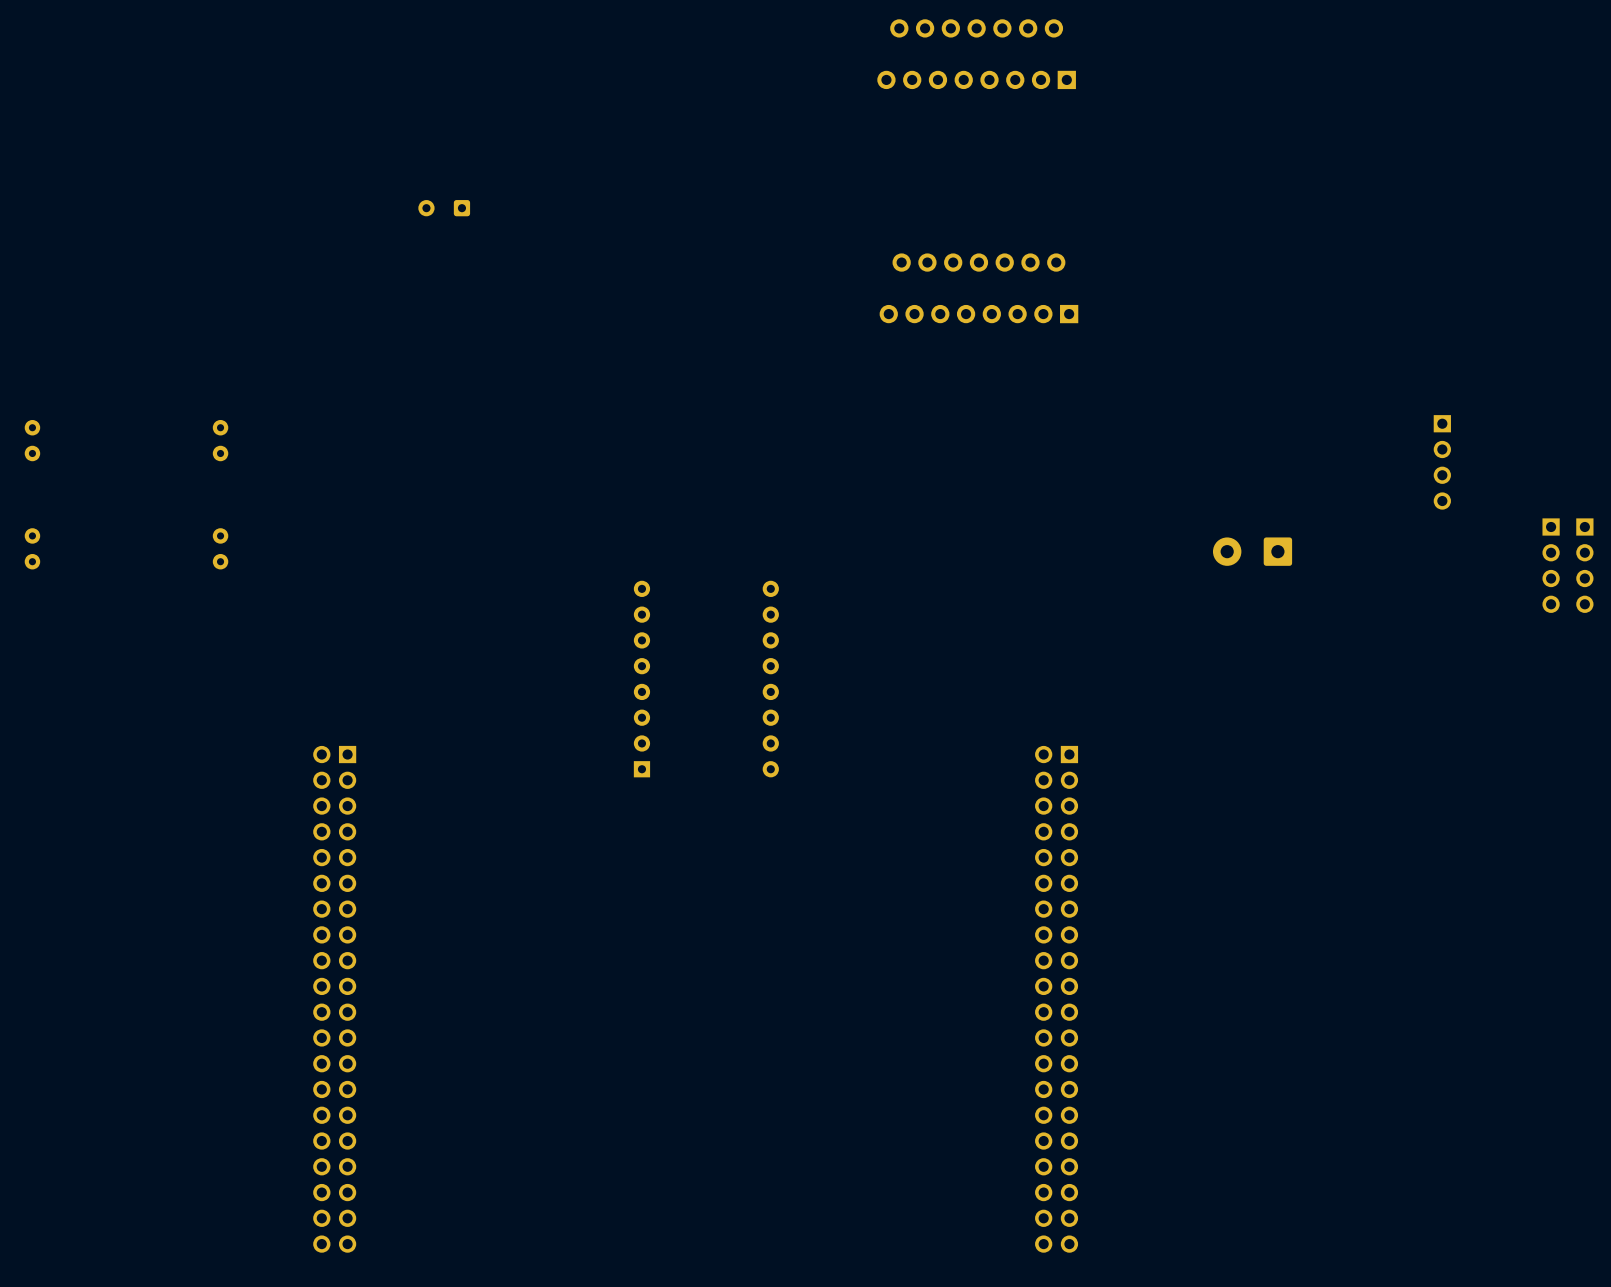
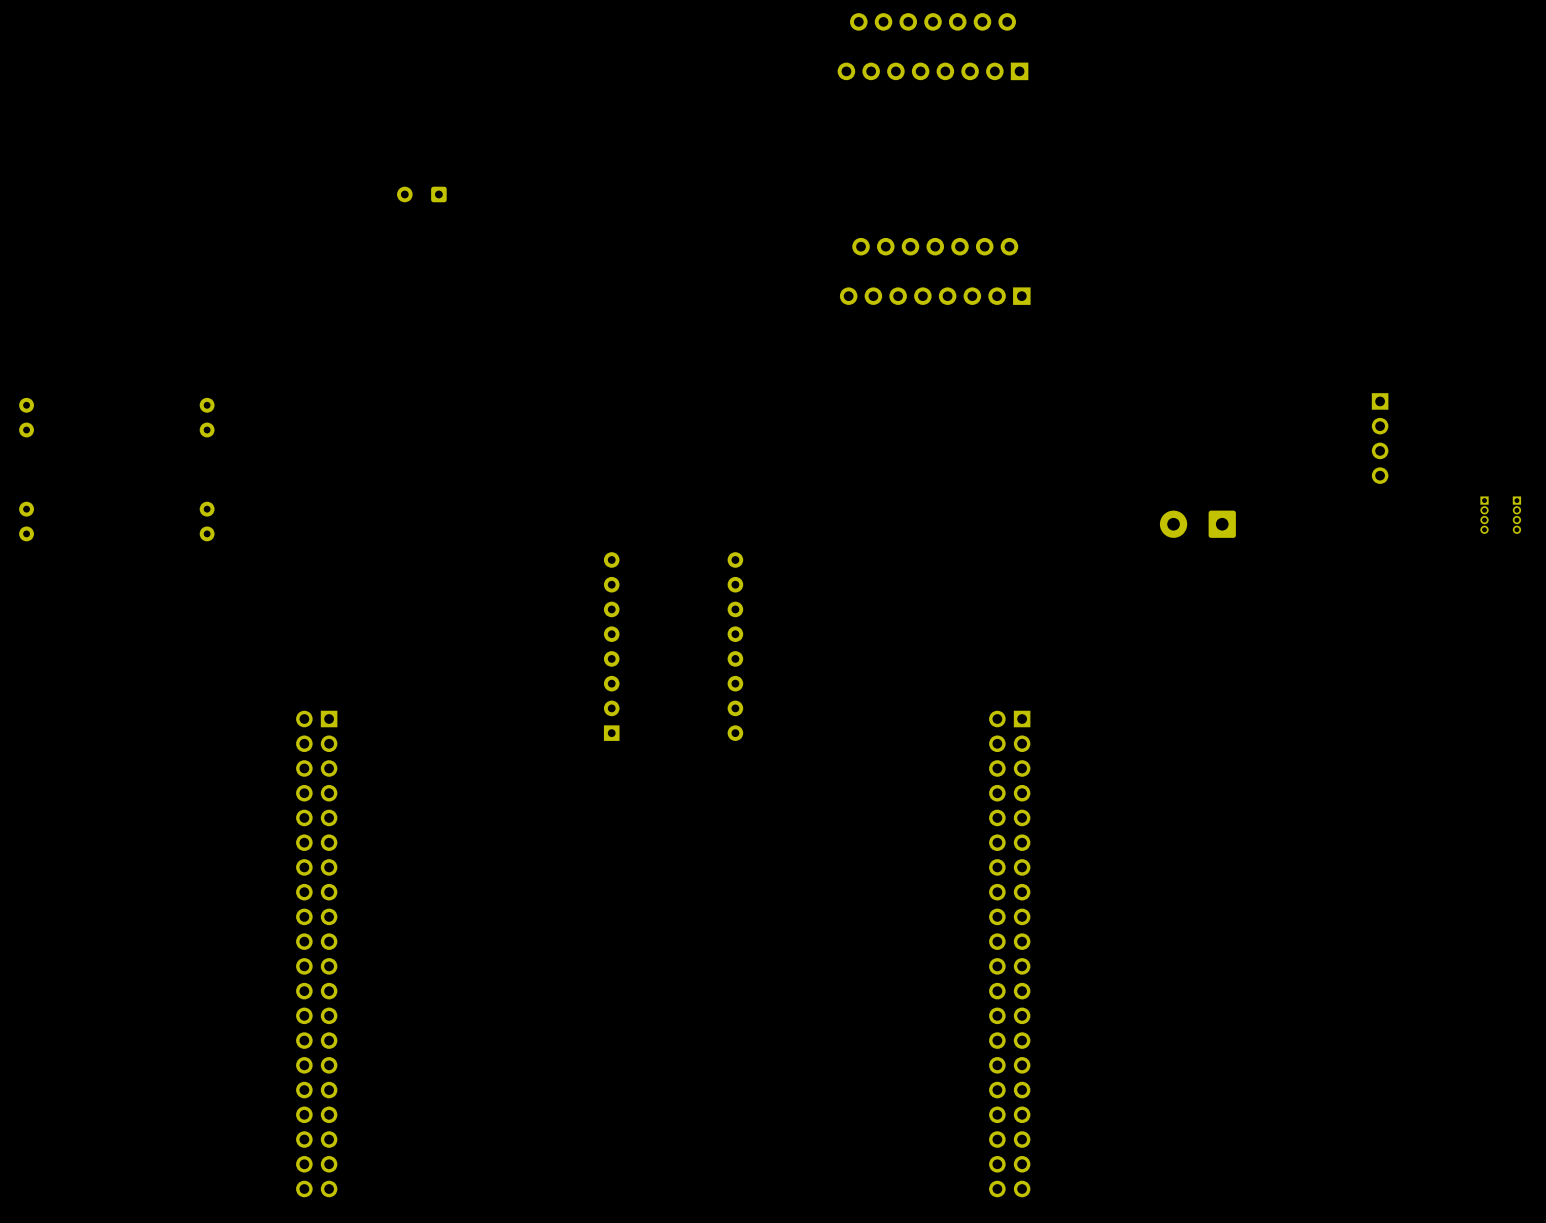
part: none -> (1484, 515)
part: none -> (1516, 515)
part: (1551, 565) -> none
part: (1584, 565) -> none

